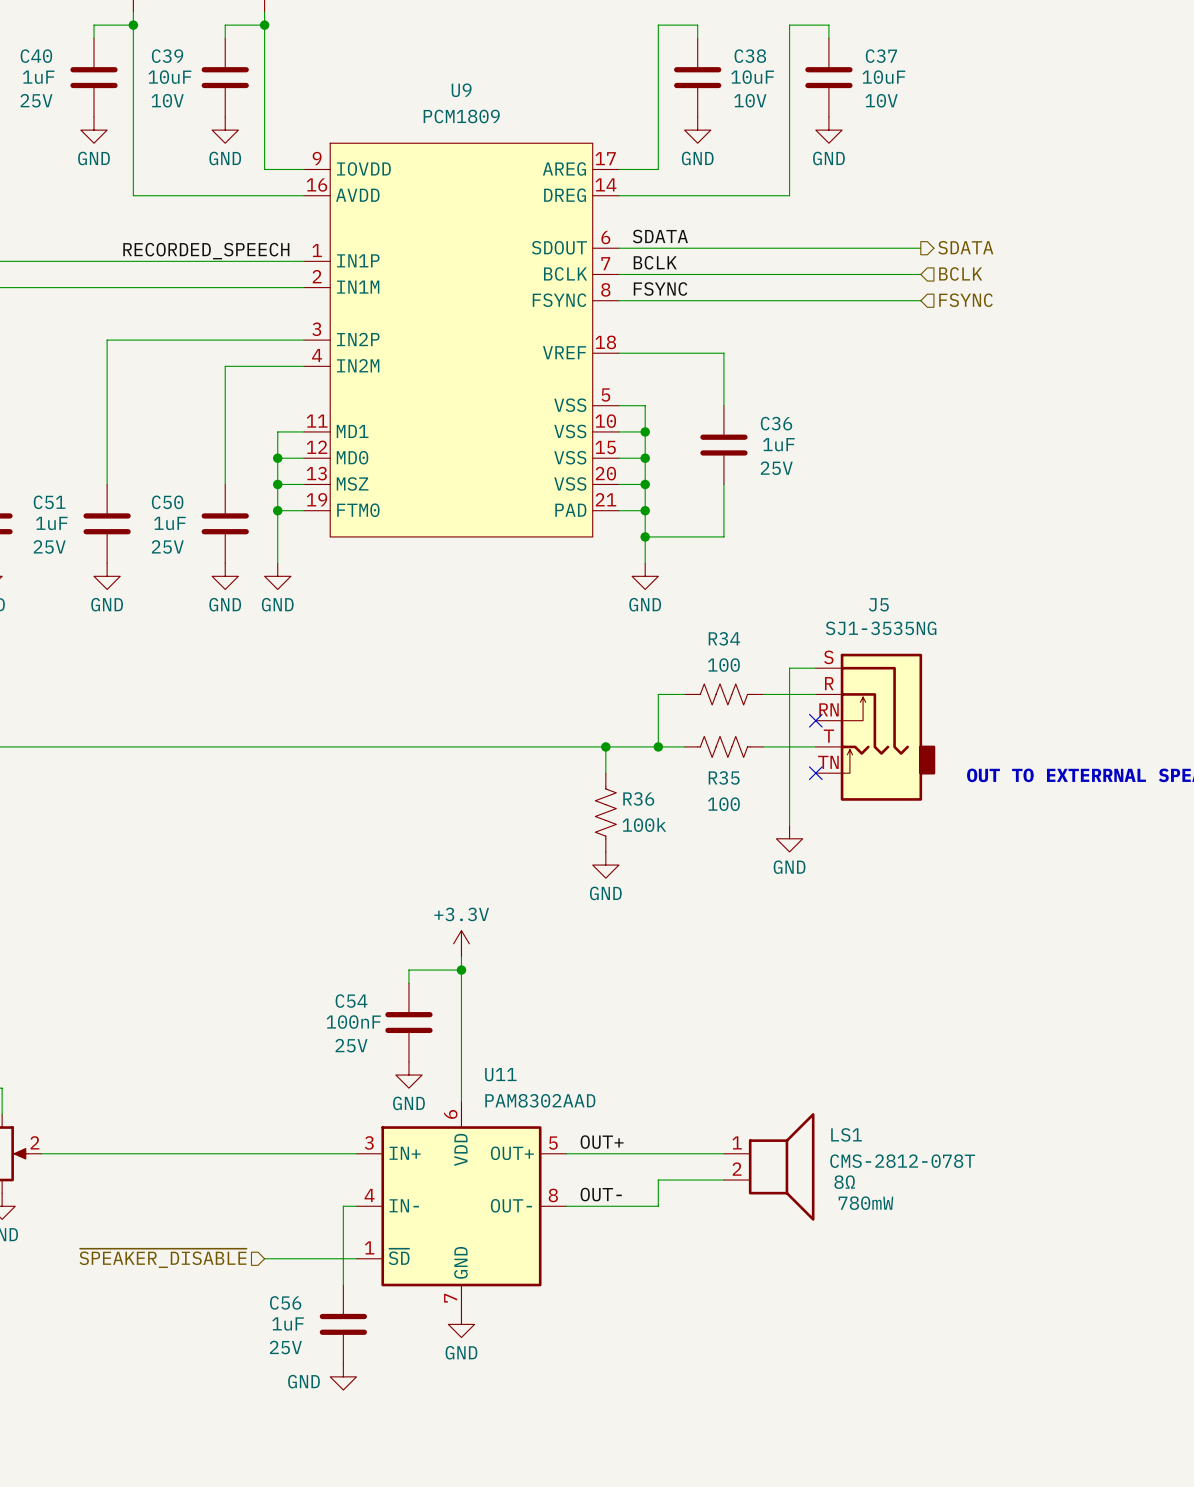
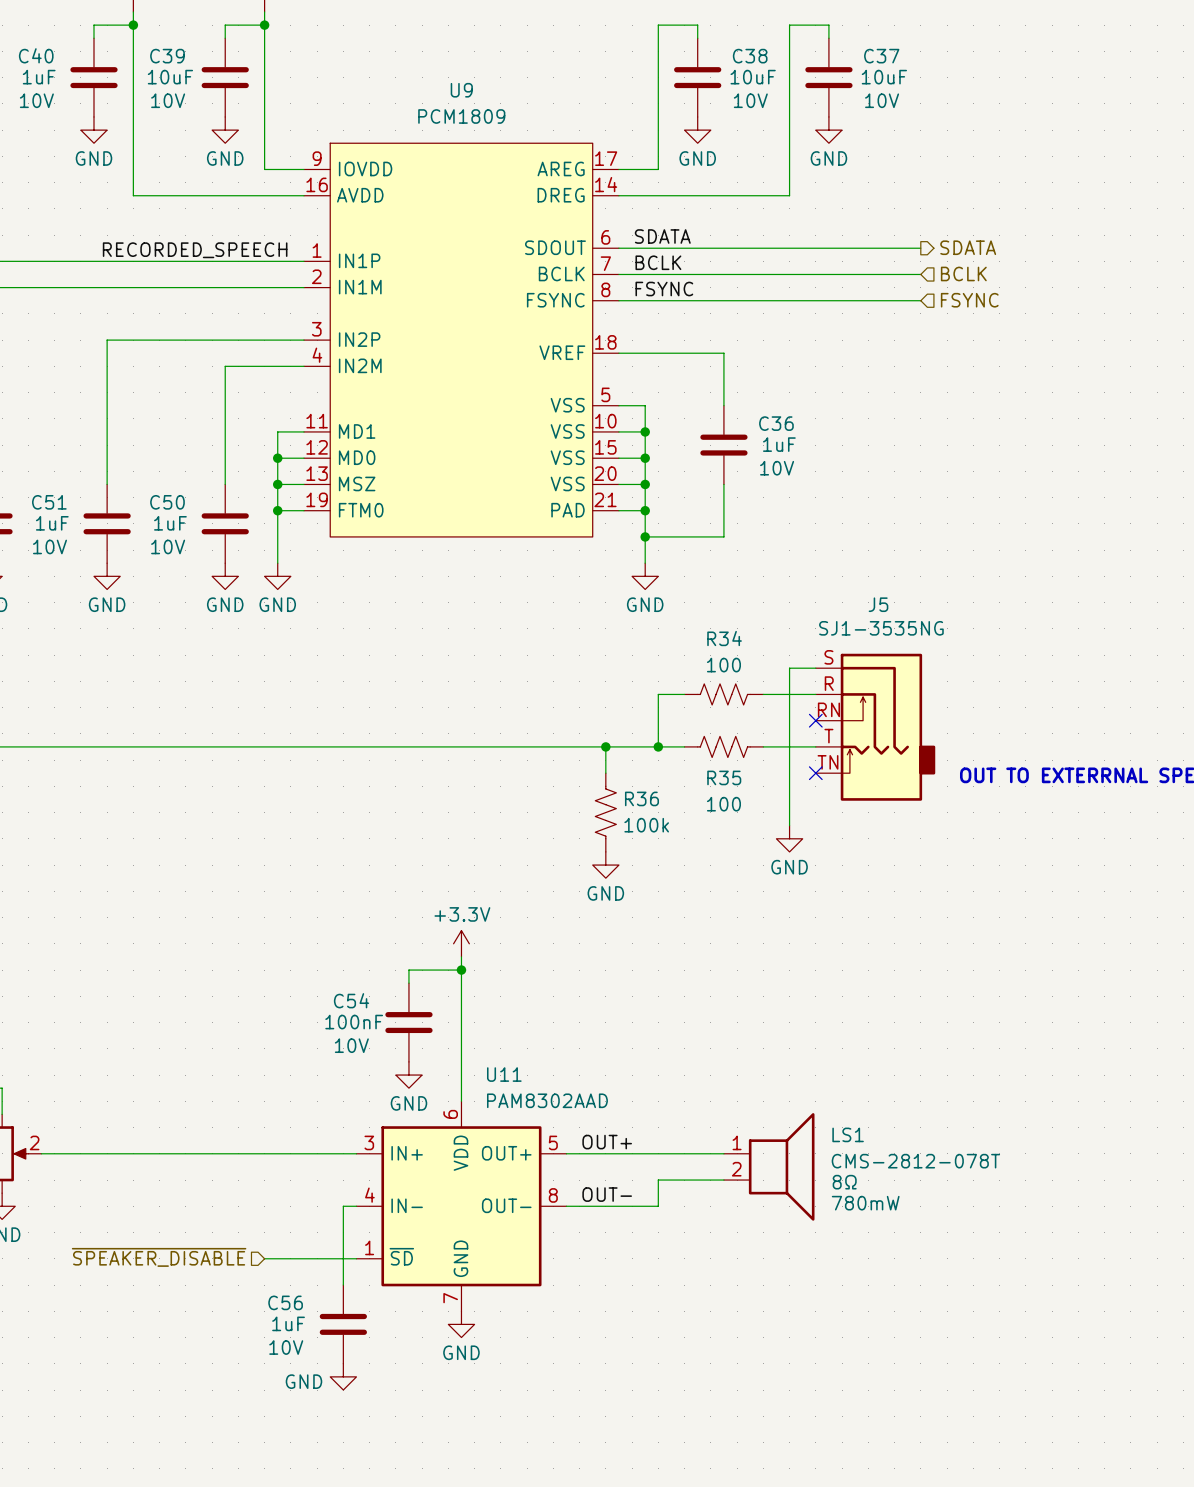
C40 text: 25V (36, 100) -> 10V (36, 100)
C36 text: 25V (776, 468) -> 10V (777, 468)
C51 text: 25V (49, 546) -> 10V (49, 546)
C50 text: 25V (167, 546) -> 10V (168, 546)
C54 text: 25V (351, 1045) -> 10V (351, 1045)
C56 text: 25V (285, 1347) -> 10V (286, 1347)

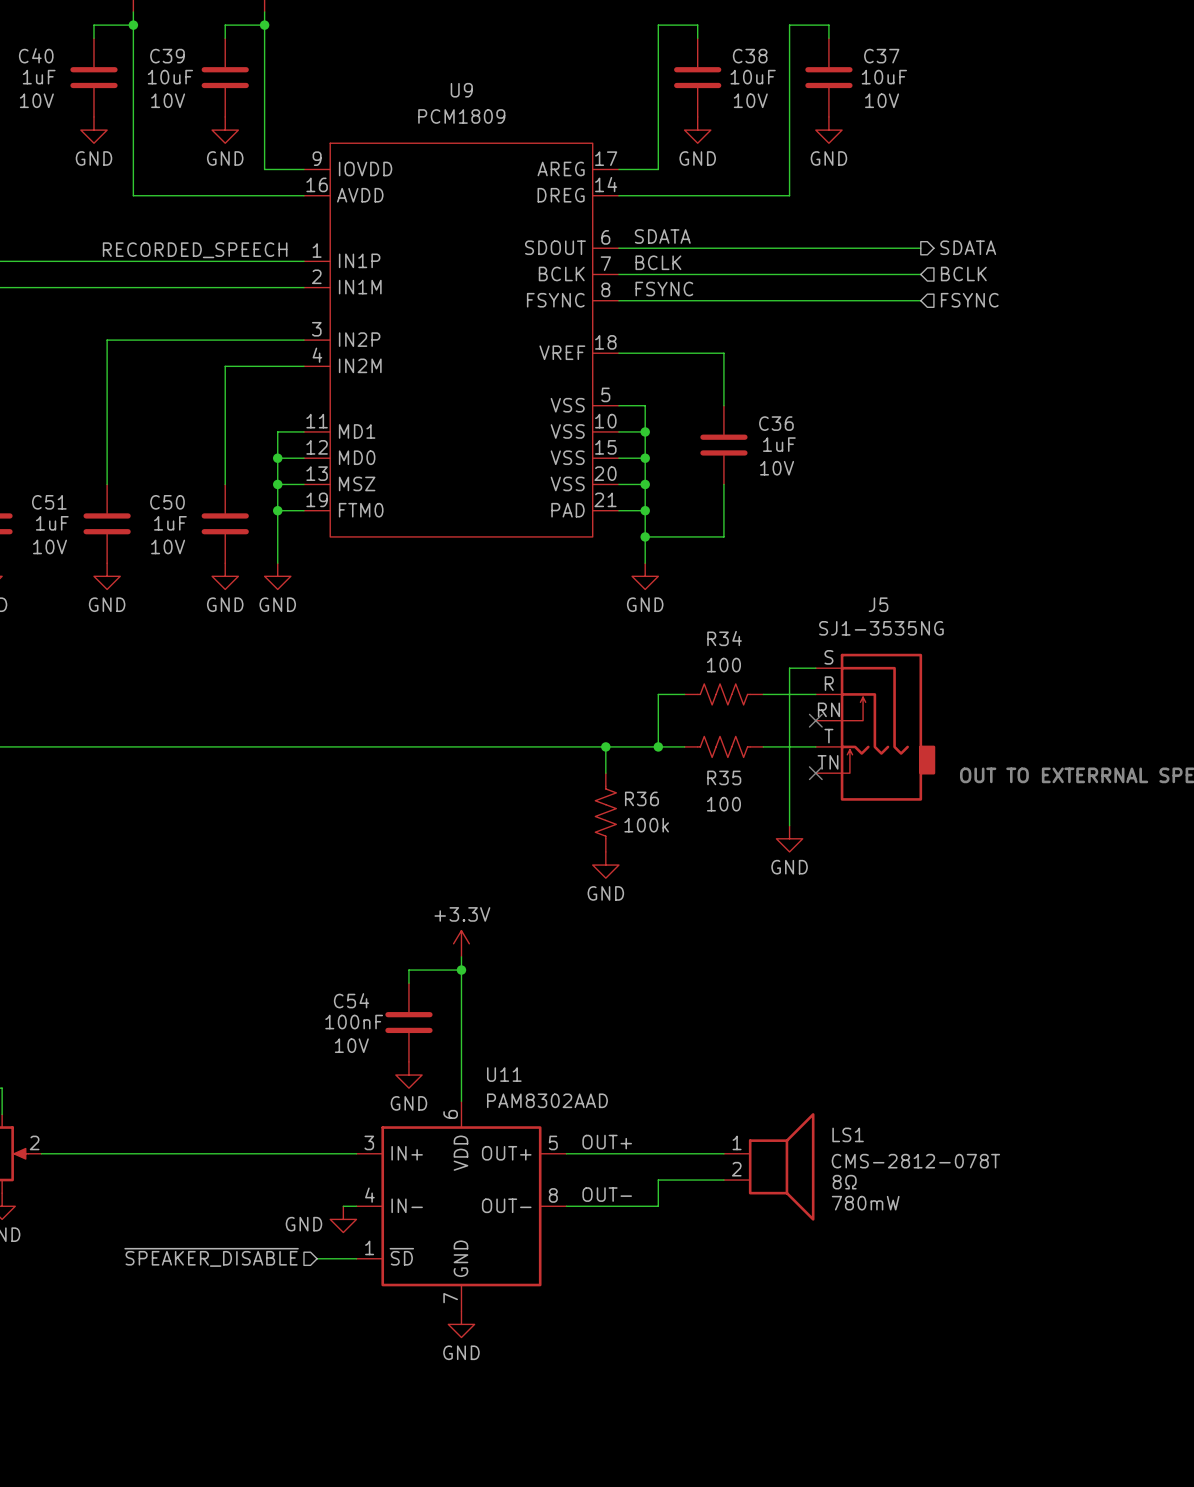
wire: (343, 1206) (343, 1285) -> none
hierarchical label position: ~{SPEAKER_DISABLE} (159, 1257) -> ~{SPEAKER_DISABLE} (211, 1257)
wire: (264, 1258) (317, 1258) -> none
C56: 1uF (343, 1324) -> none
power symbol position: GND (343, 1376) -> GND (343, 1219)

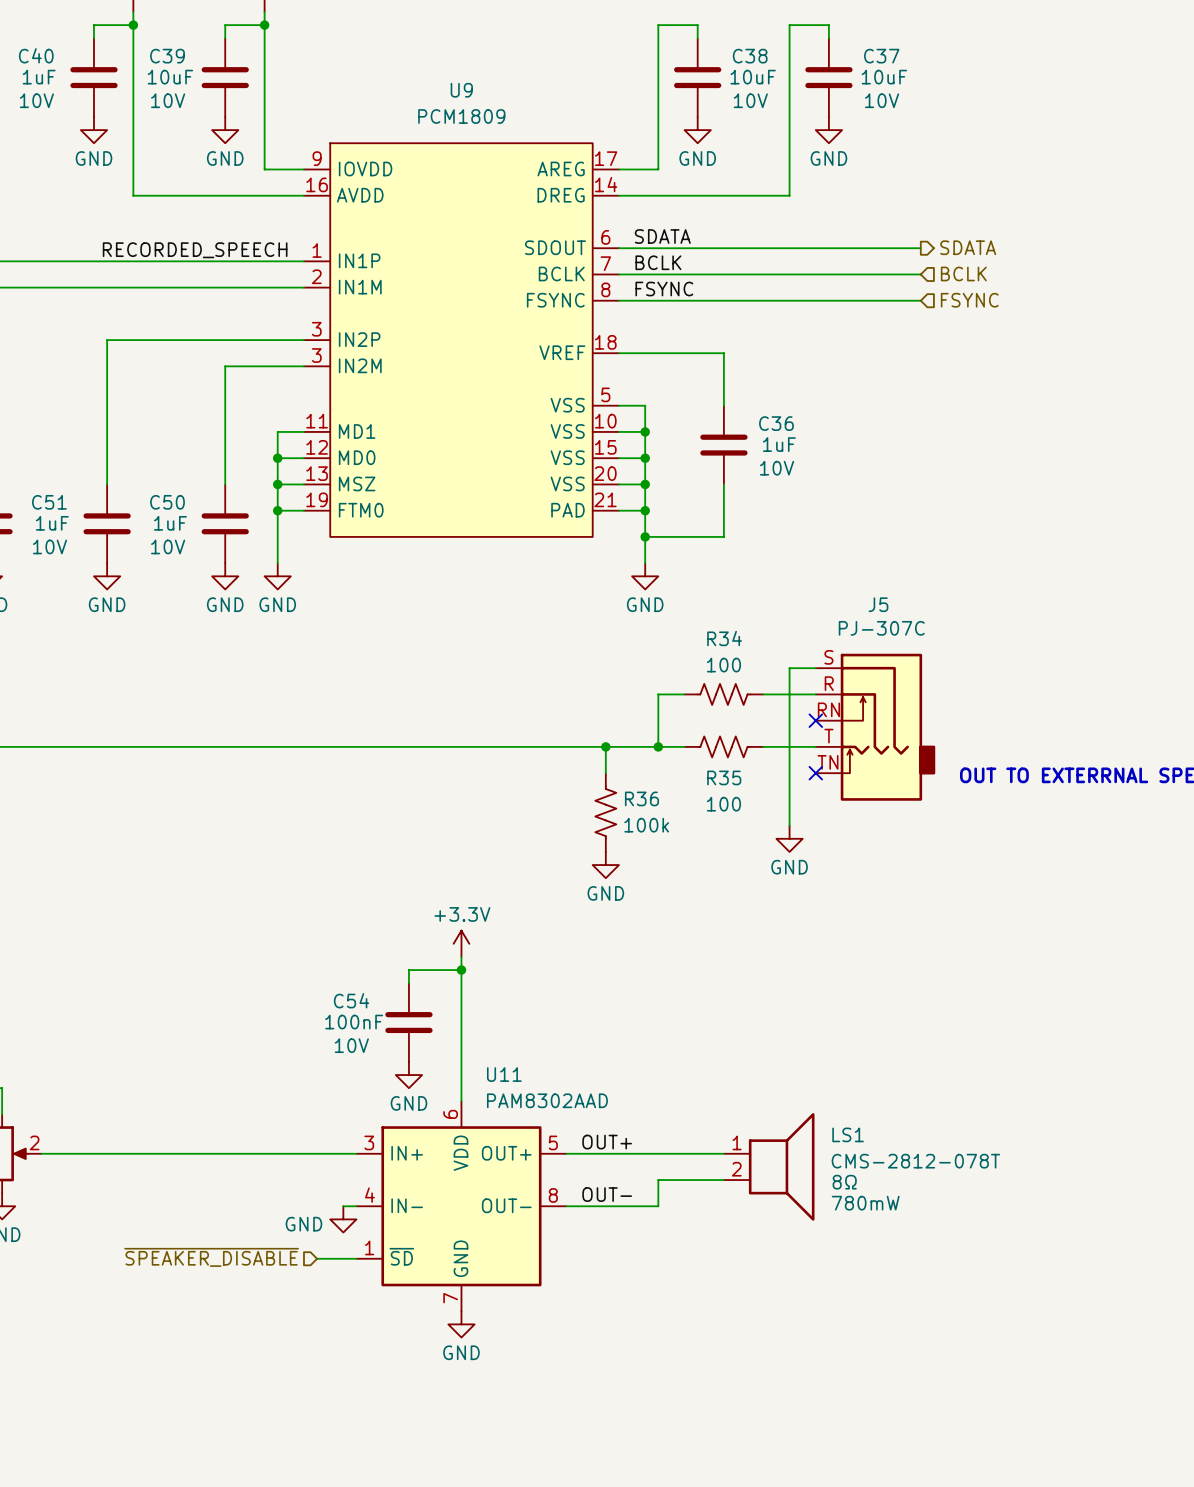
U9 pin number: 4 (317, 355) -> 3 (316, 355)
J5 value: SJ1-3535NG (881, 628) -> PJ-307C (881, 628)

